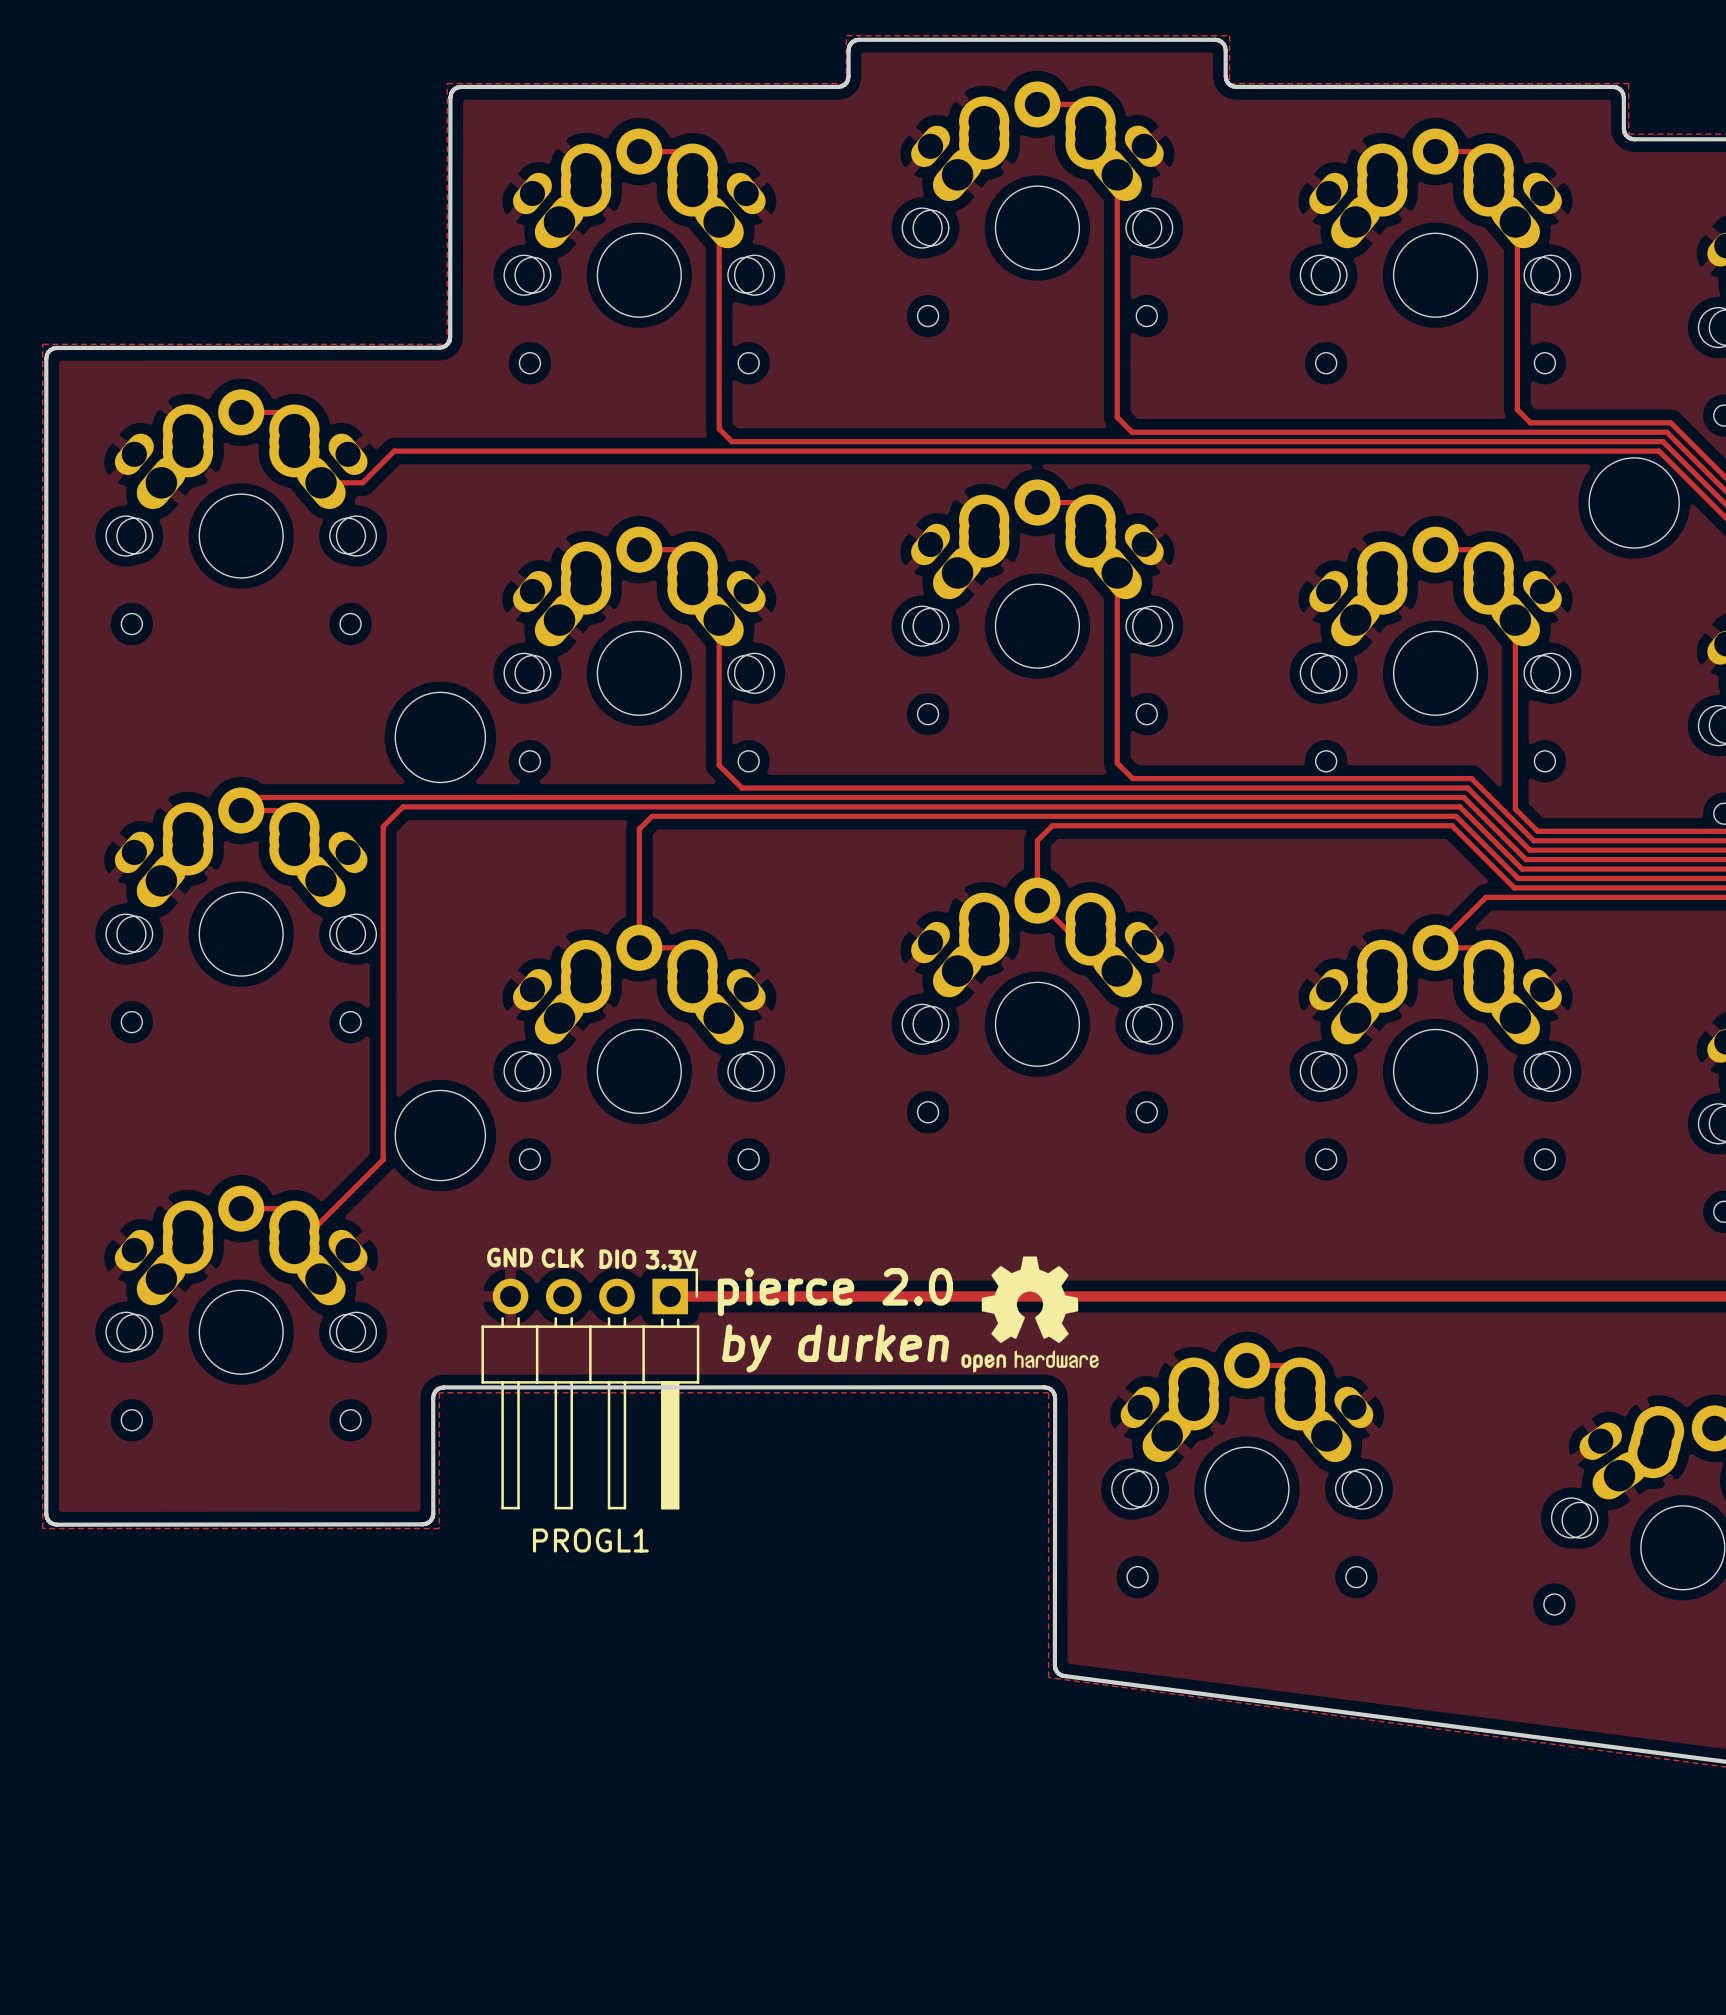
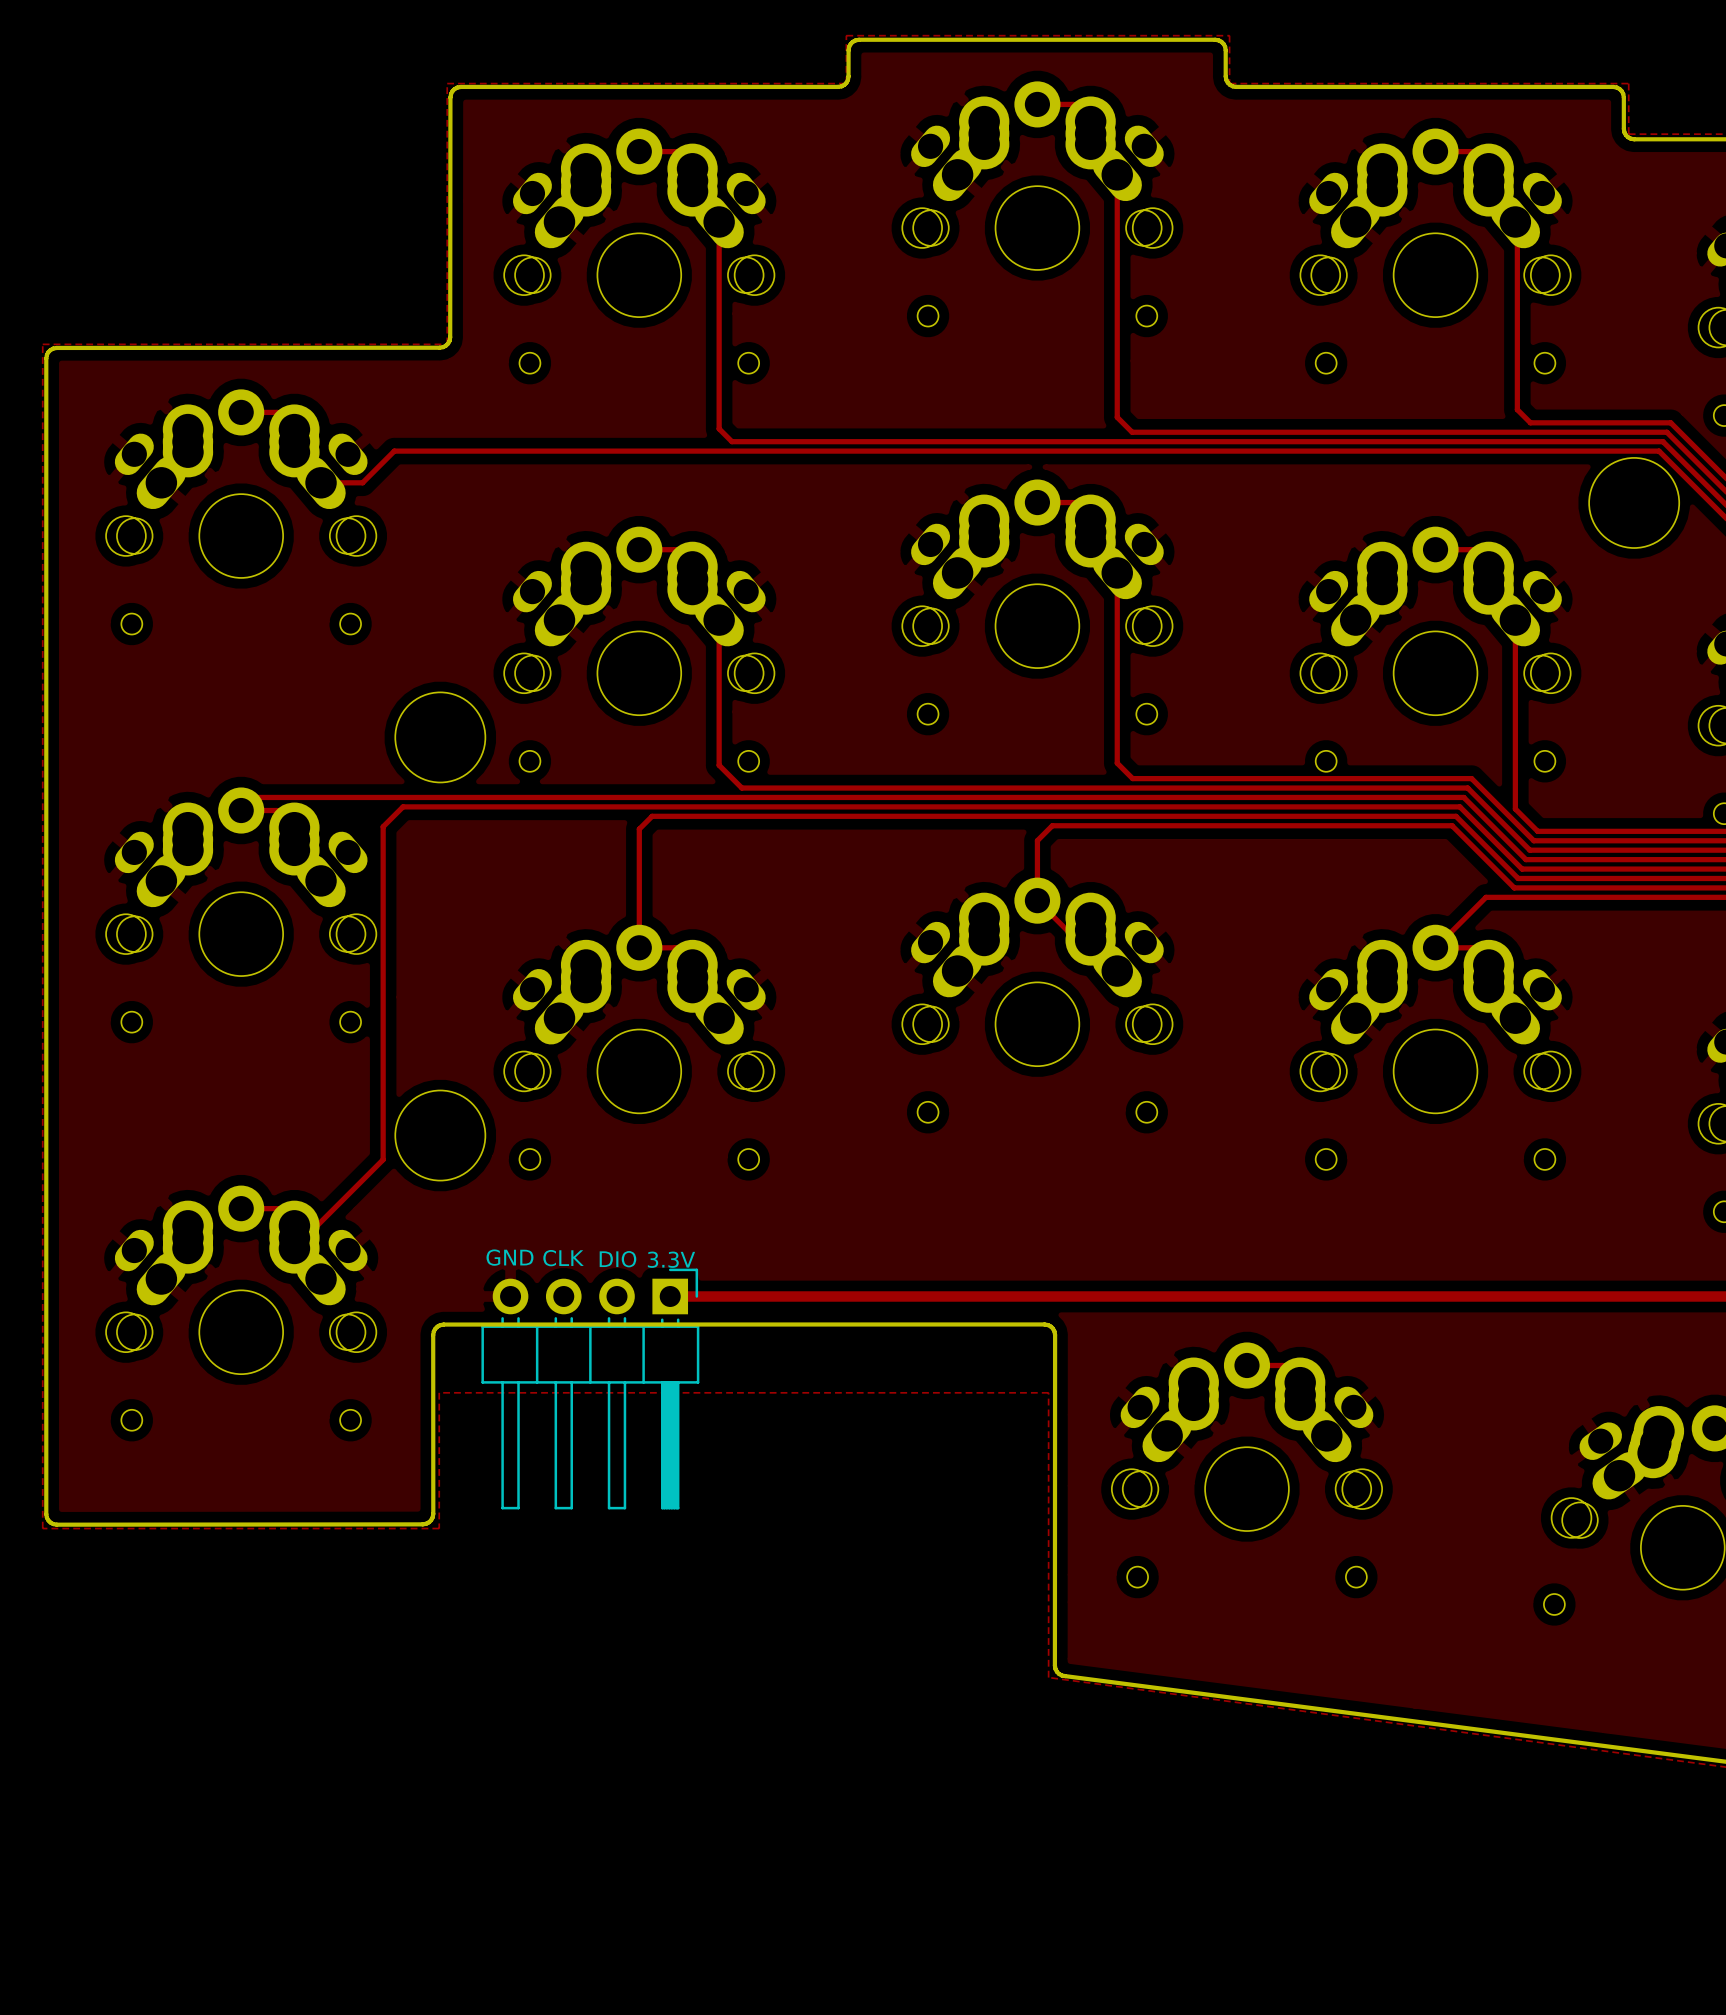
drawing: [961, 1256, 1099, 1373] -> none
text: pierce 2.0 (835, 1292) -> none
text: by durken (835, 1348) -> none
board edge: (433, 1513) (433, 1397) (435, 1391) (440, 1388) (1048, 1387) (1053, 1391) (1055, 1397) (1054, 1665) -> (433, 1513) (433, 1335) (435, 1328) (440, 1325) (1048, 1325) (1053, 1328) (1055, 1334) (1054, 1665)
PROGL1 name: PROGL1 (590, 1540) -> none

